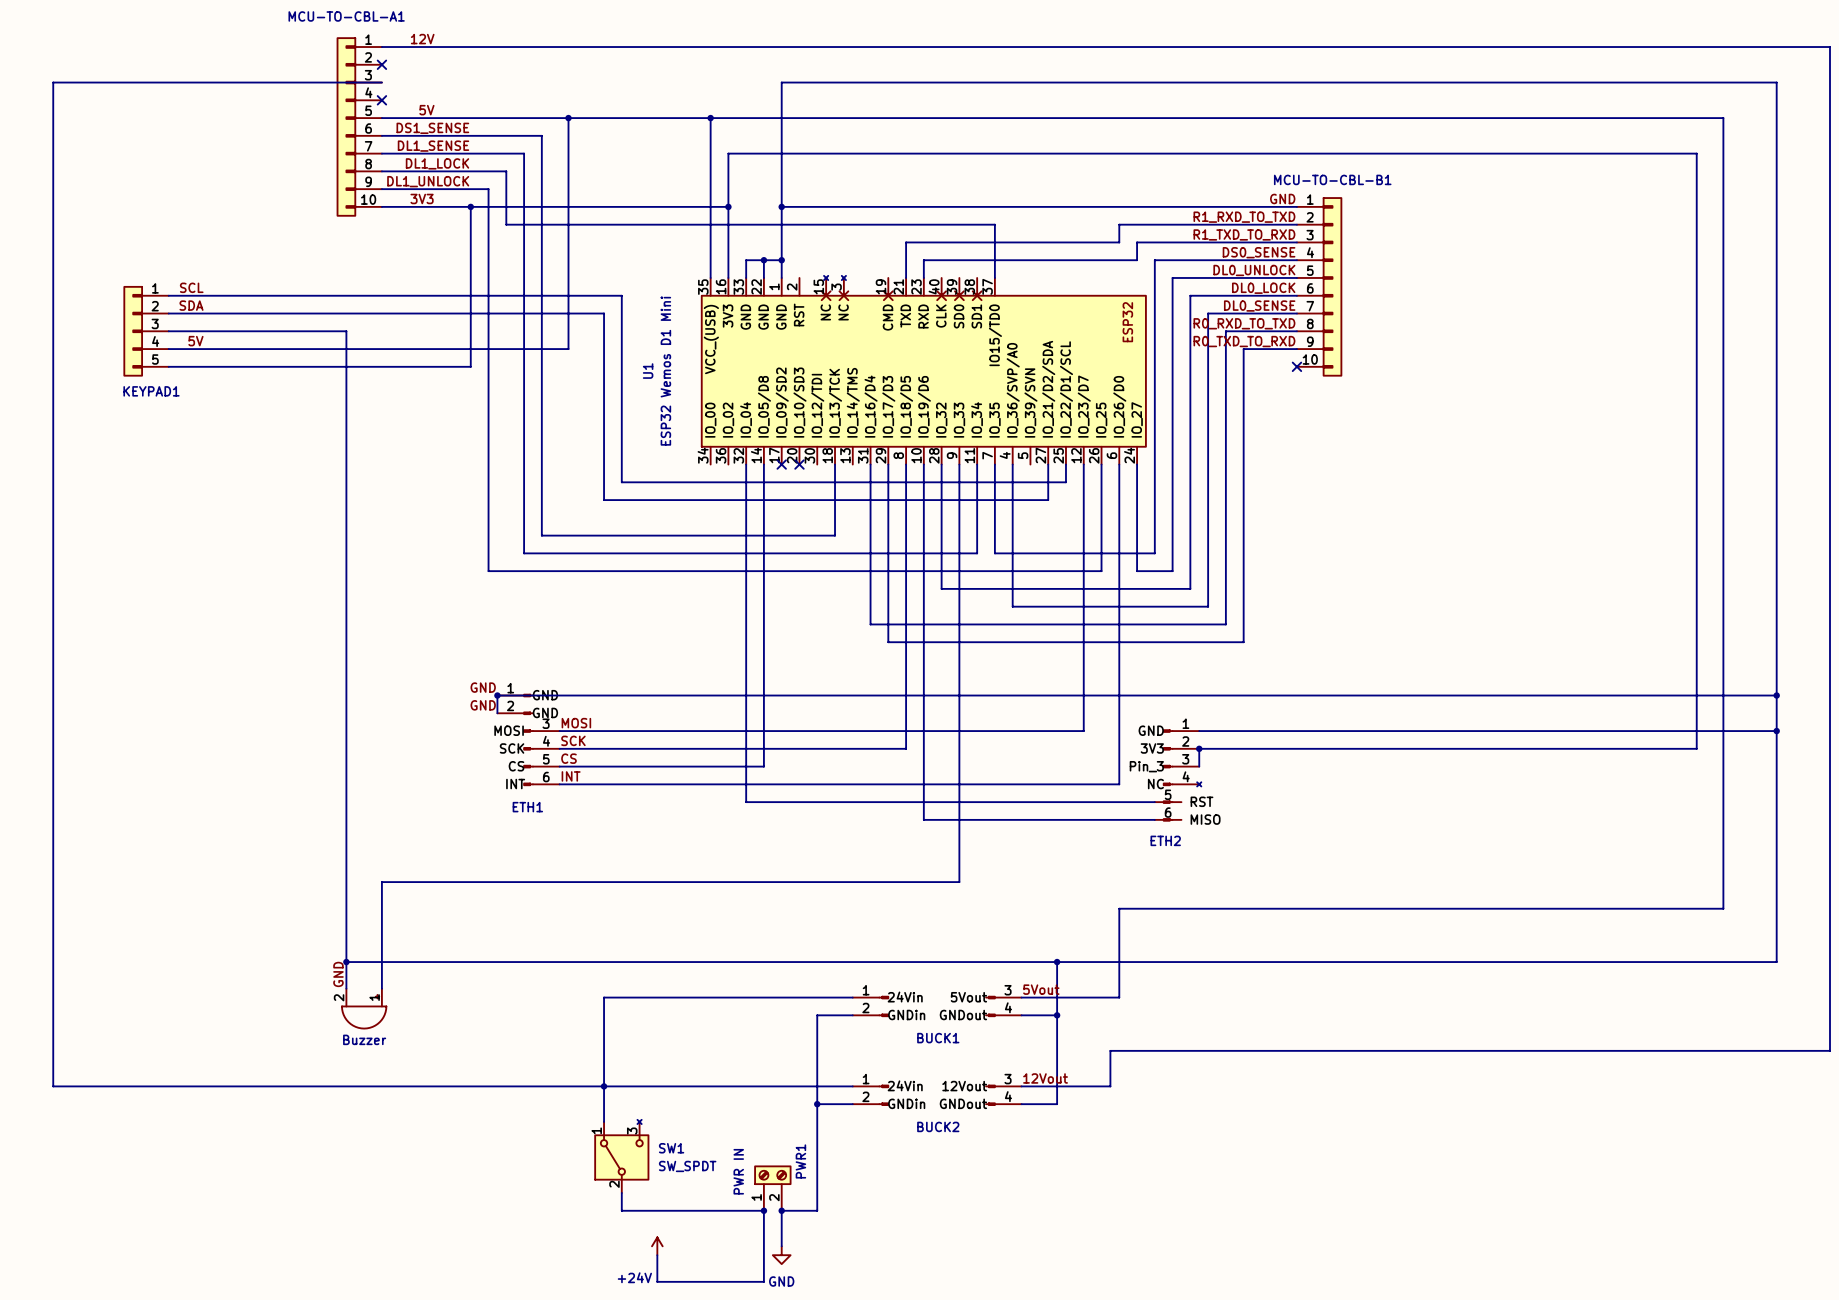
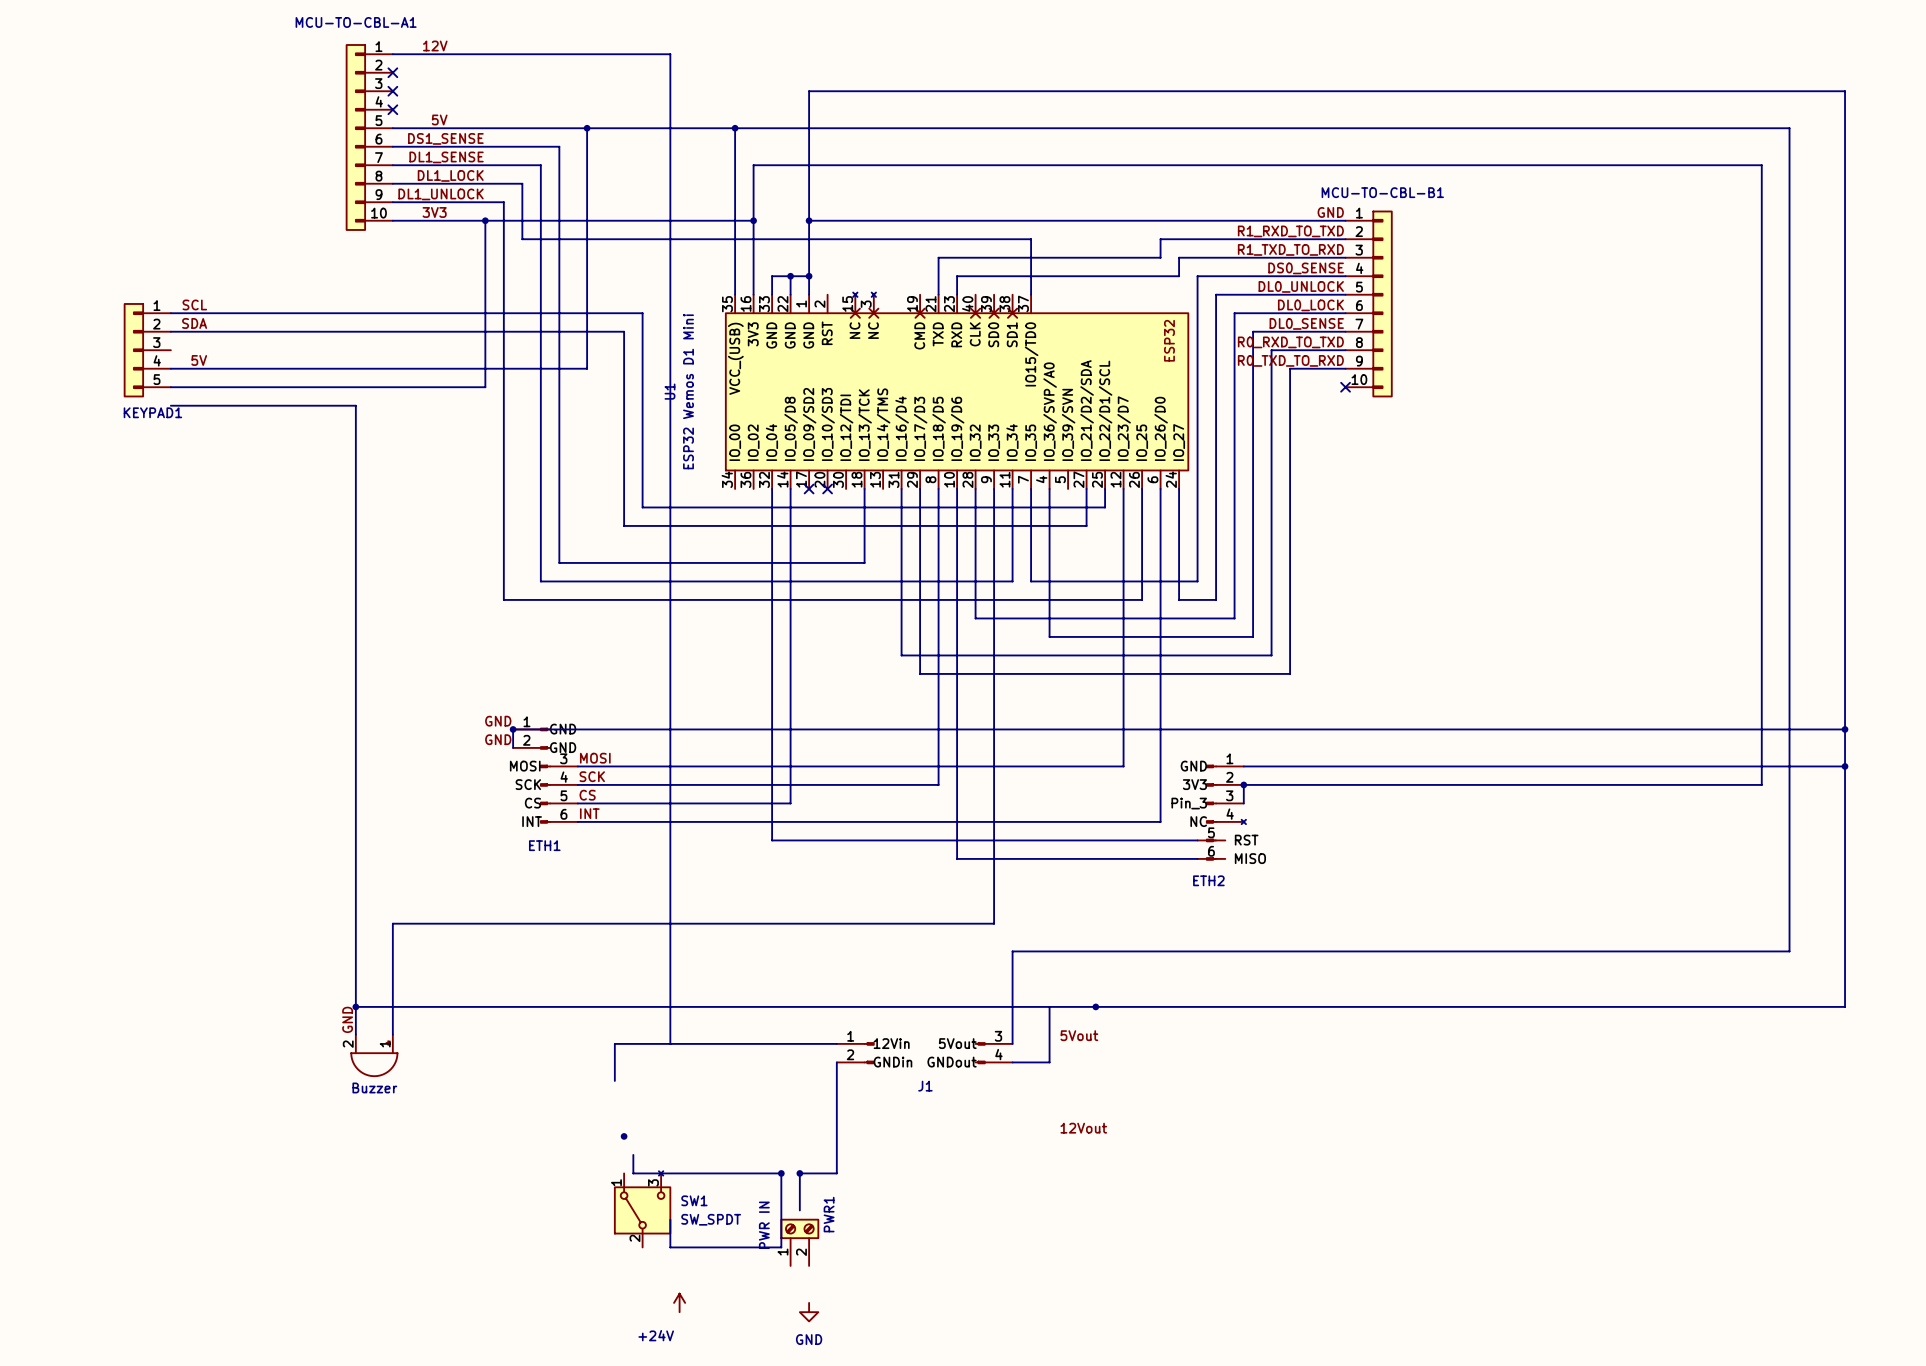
wire: (648, 47) (1829, 47) (1829, 1050) (1110, 1050) (1110, 1086) (1021, 1086) -> (670, 54) (670, 1043)
wire: (381, 82) (53, 82) (53, 1086) (852, 1086) -> none
no-connect mark: none -> (392, 91)
wire: (168, 331) (346, 331) (346, 384) -> (170, 405) (355, 405)
wire: (1119, 908) (1119, 997) (1021, 997) -> (1160, 951) (1012, 951) (1012, 1043)
wire: none -> (1049, 1006) (1049, 1062) (1012, 1062)
wire: (1057, 962) (1057, 1104) (1021, 1104) -> none
wire: (604, 997) (604, 1121) -> (624, 1043) (614, 1043) (614, 1080)
J1: none -> (924, 1053)
BUCK1: (937, 1006) -> none
wire: none -> (836, 1062) (836, 1173) (799, 1173) (799, 1210)
wire: (852, 1015) (817, 1015) (817, 1210) (781, 1210) (781, 1246) -> none
wire: (1021, 1015) (1057, 1015) -> none
junction: (1057, 1015) -> none
BUCK2: (937, 1095) -> none
wire: (817, 1104) (852, 1104) -> none
junction: (817, 1104) -> none
junction: none -> (781, 1173)
junction: none -> (799, 1173)
wire: (621, 1193) (621, 1210) (763, 1210) (763, 1281) (657, 1281) (657, 1255) -> (633, 1154) (633, 1173) (781, 1173) (781, 1247) (670, 1247) (670, 1219)
junction: (763, 1210) -> none
junction: (781, 1210) -> none

